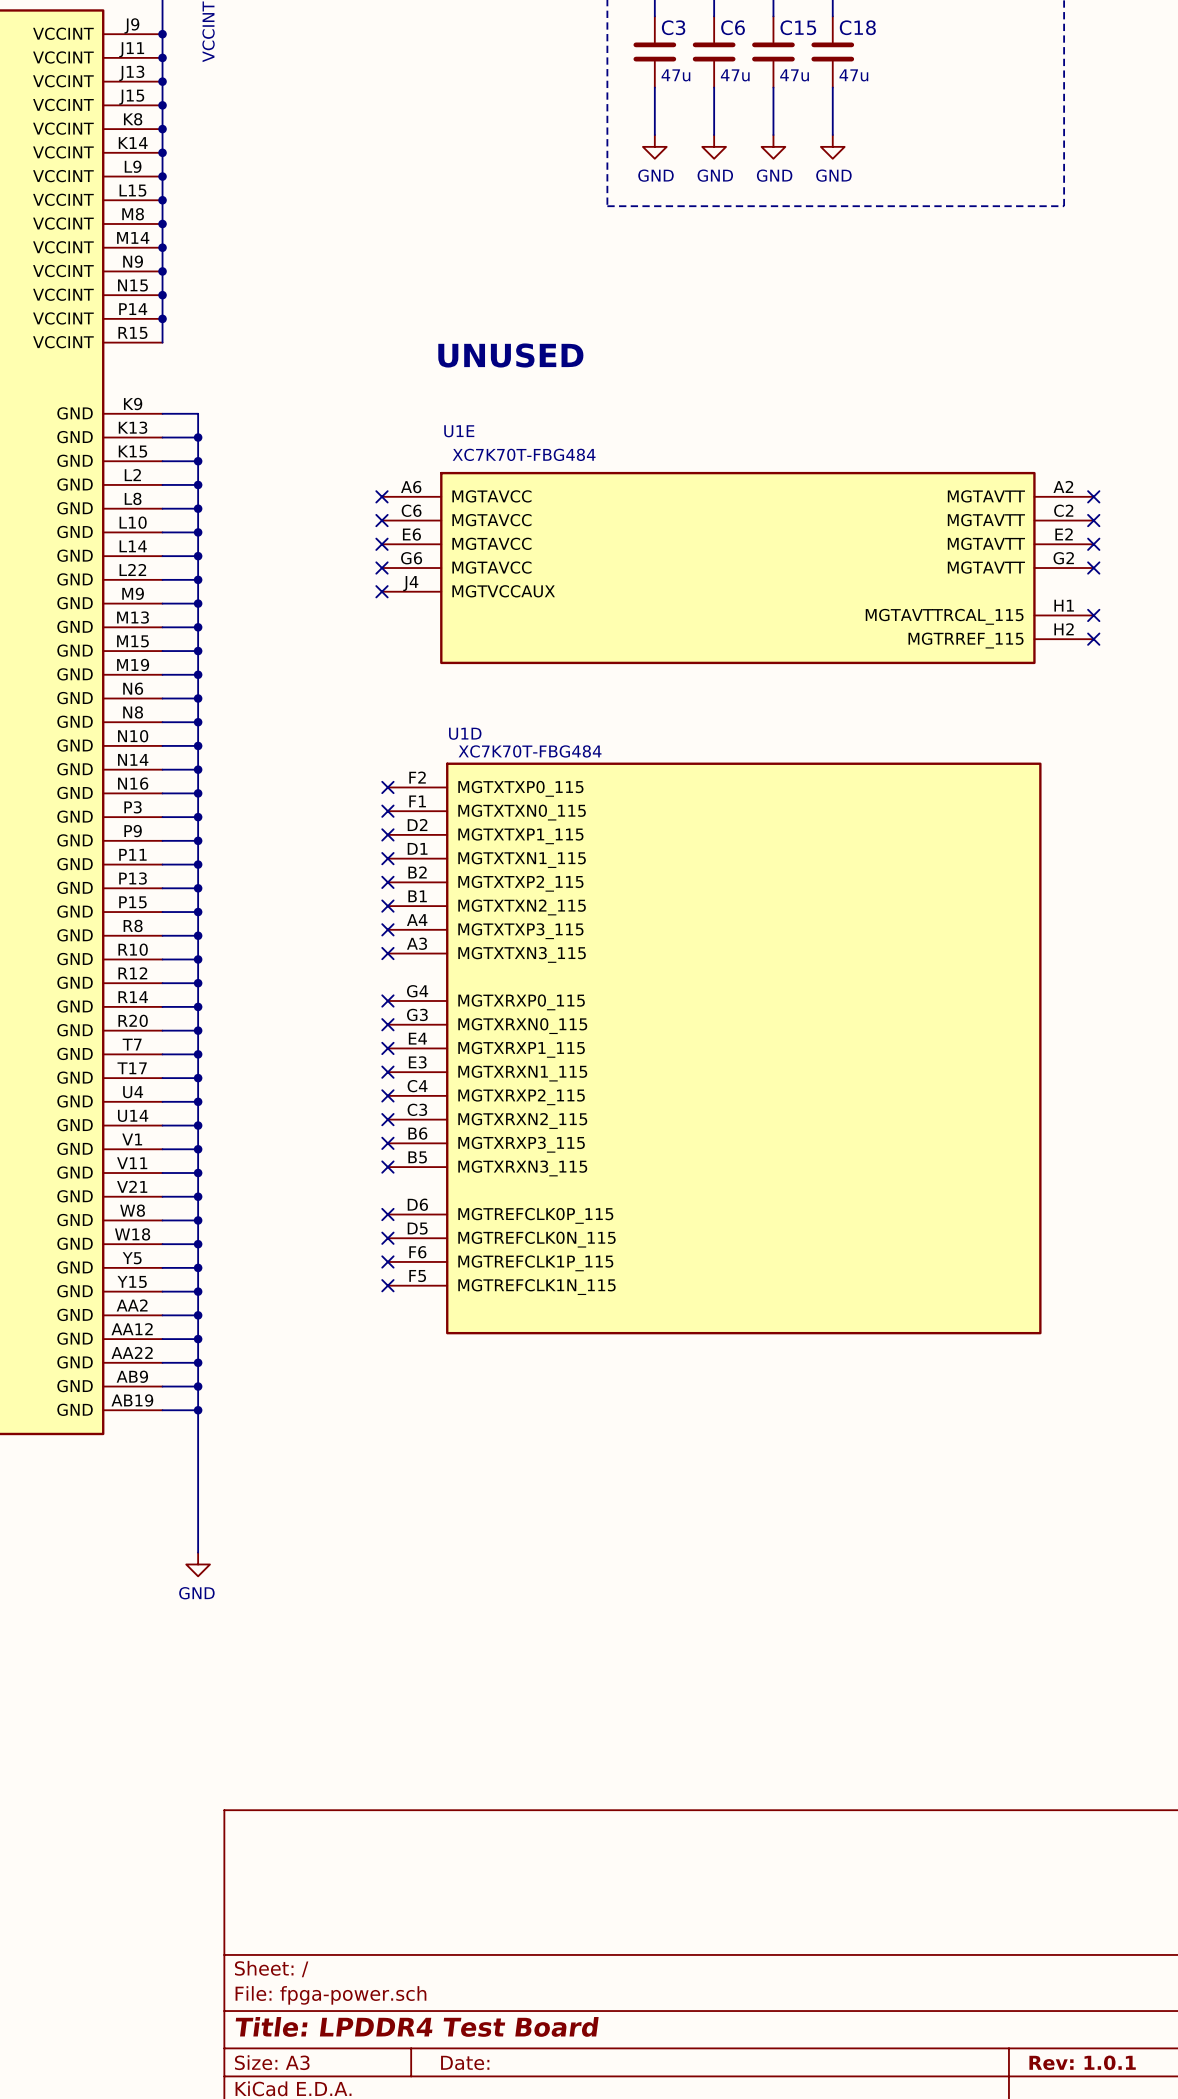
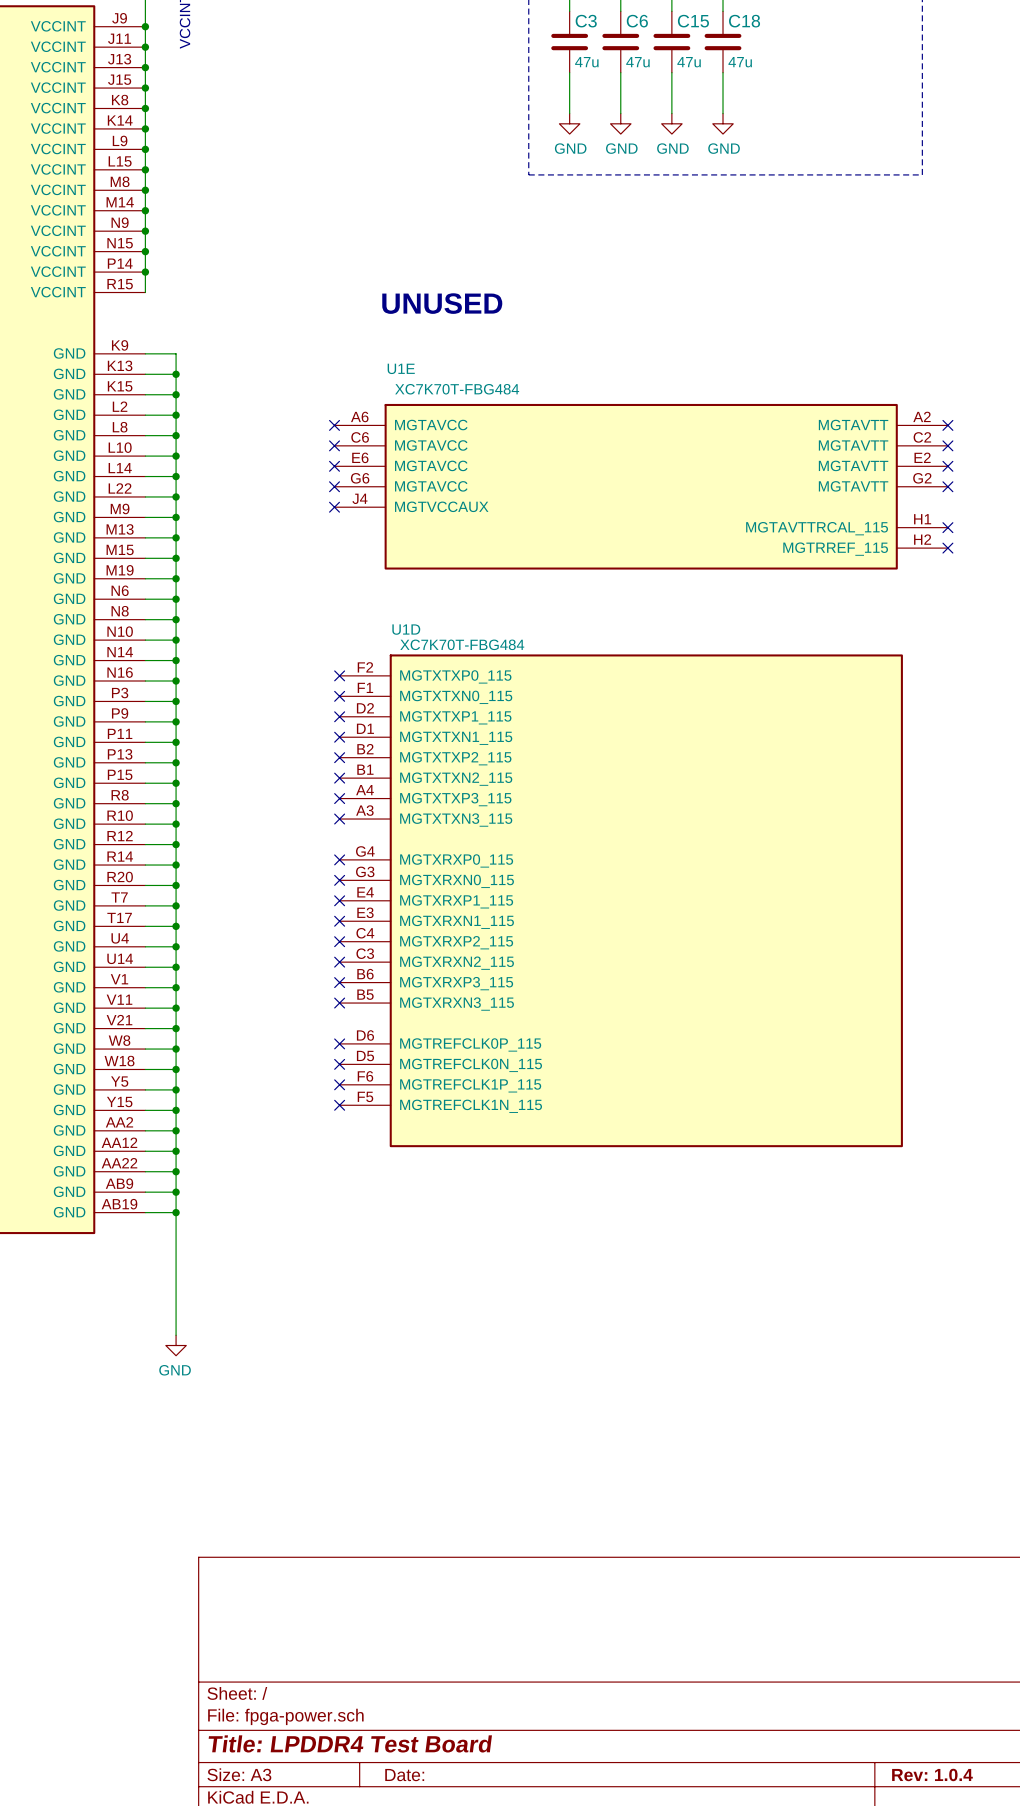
title block: Rev: 1.0.1 (1082, 2062) -> Rev: 1.0.4 (932, 1774)

